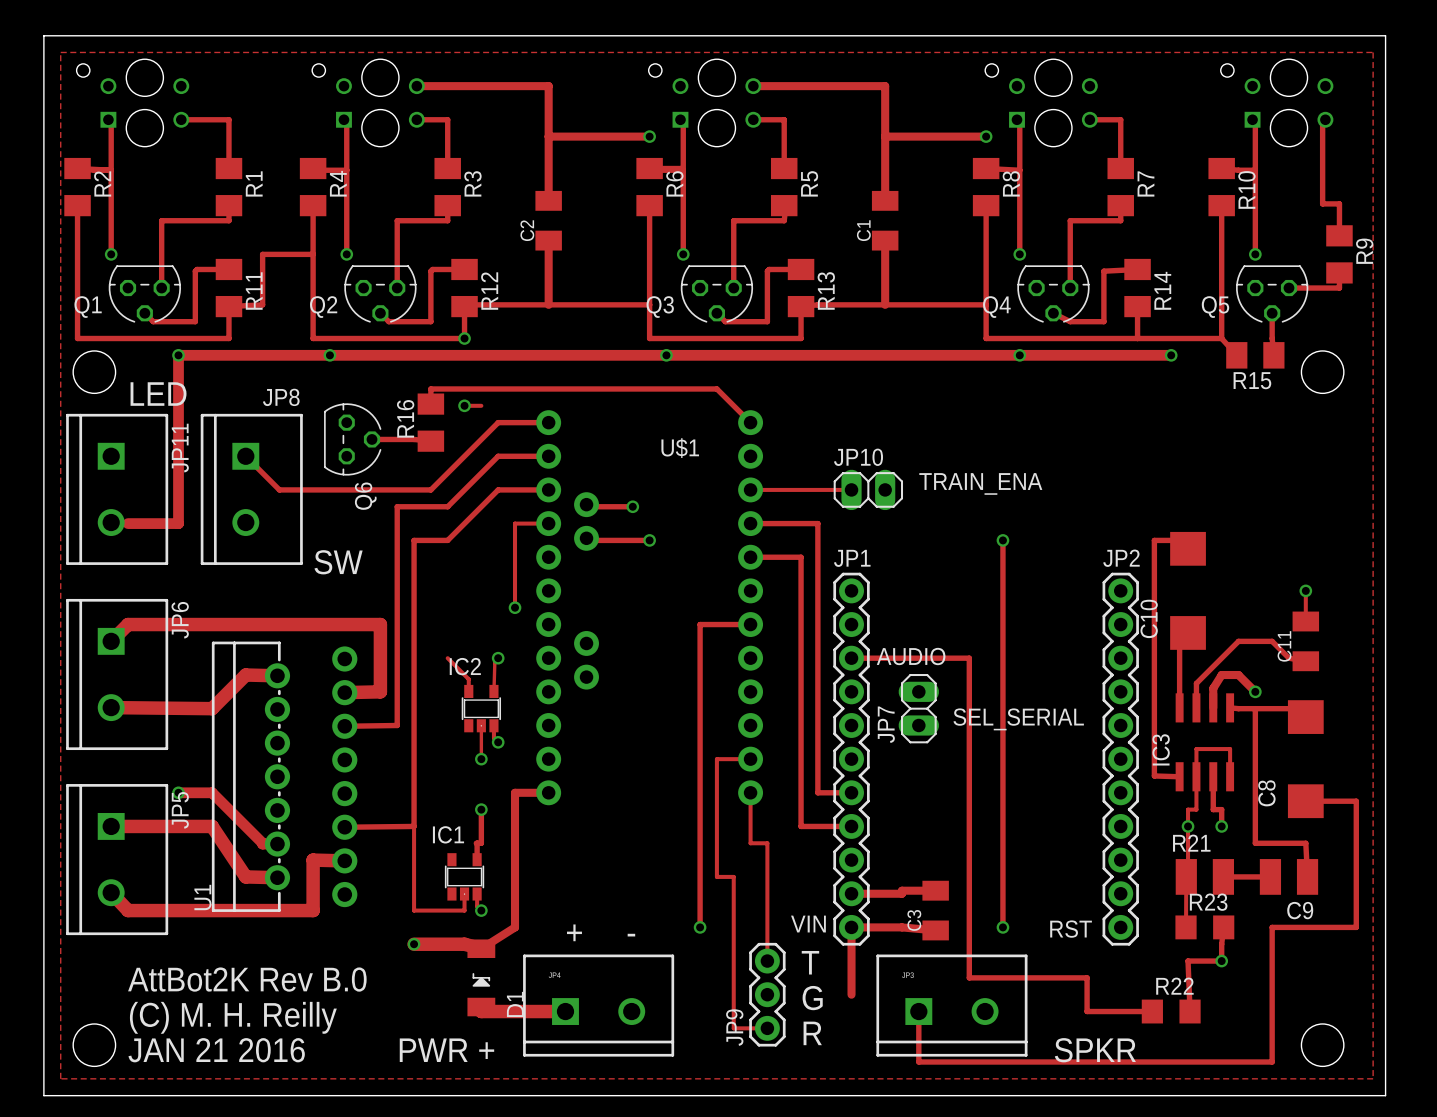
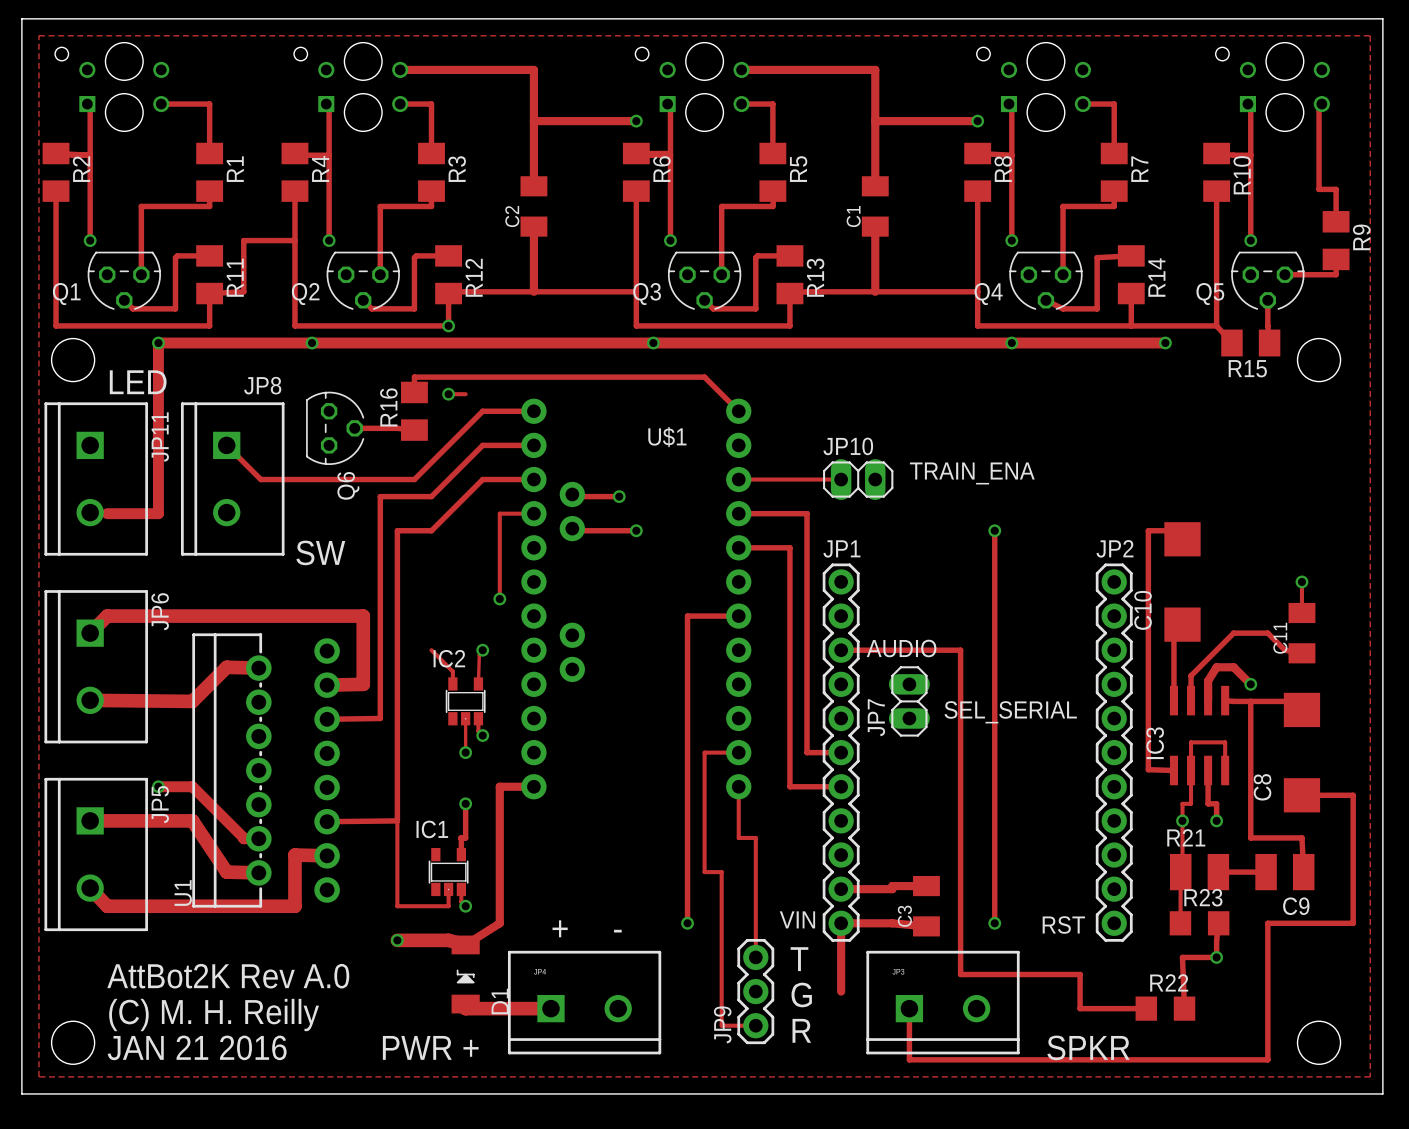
track: (817, 759) (817, 792) -> (789, 786) (807, 786)
track: none -> (807, 752) (841, 752)
track: (801, 792) (801, 826) (851, 826) -> none
text: AttBot2K Rev B.0 (247, 979) -> AttBot2K Rev A.0 (228, 976)

